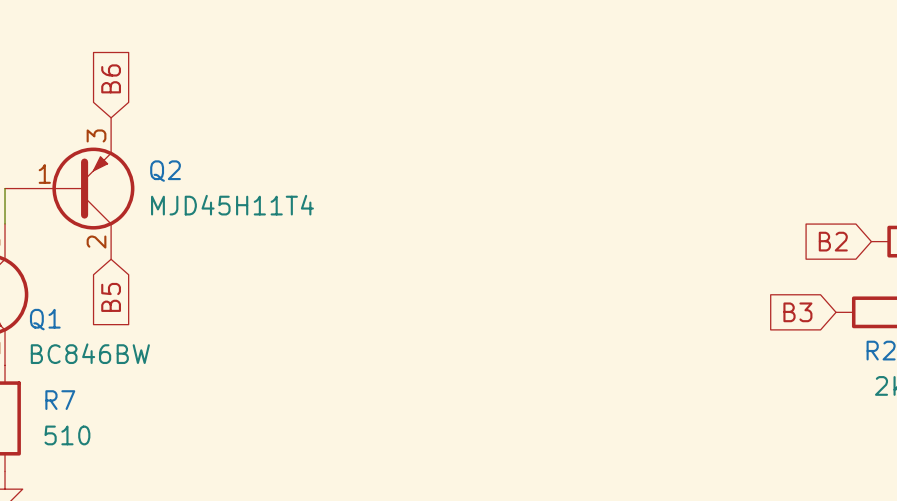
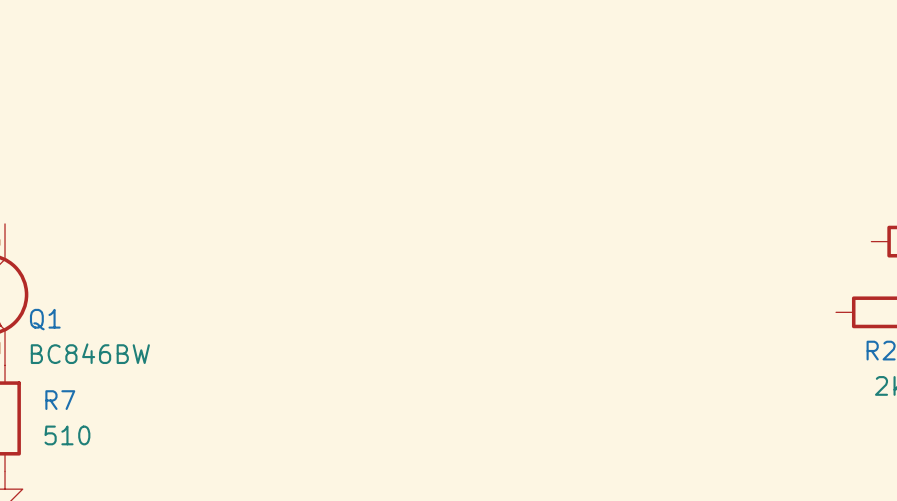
global label: B6 (111, 78) -> none
wire: (5, 188) (5, 223) -> none
Q2: MJD45H11T4 (69, 188) -> none
global label: B2 (833, 241) -> none
global label: B5 (111, 297) -> none
global label: B3 (797, 312) -> none

